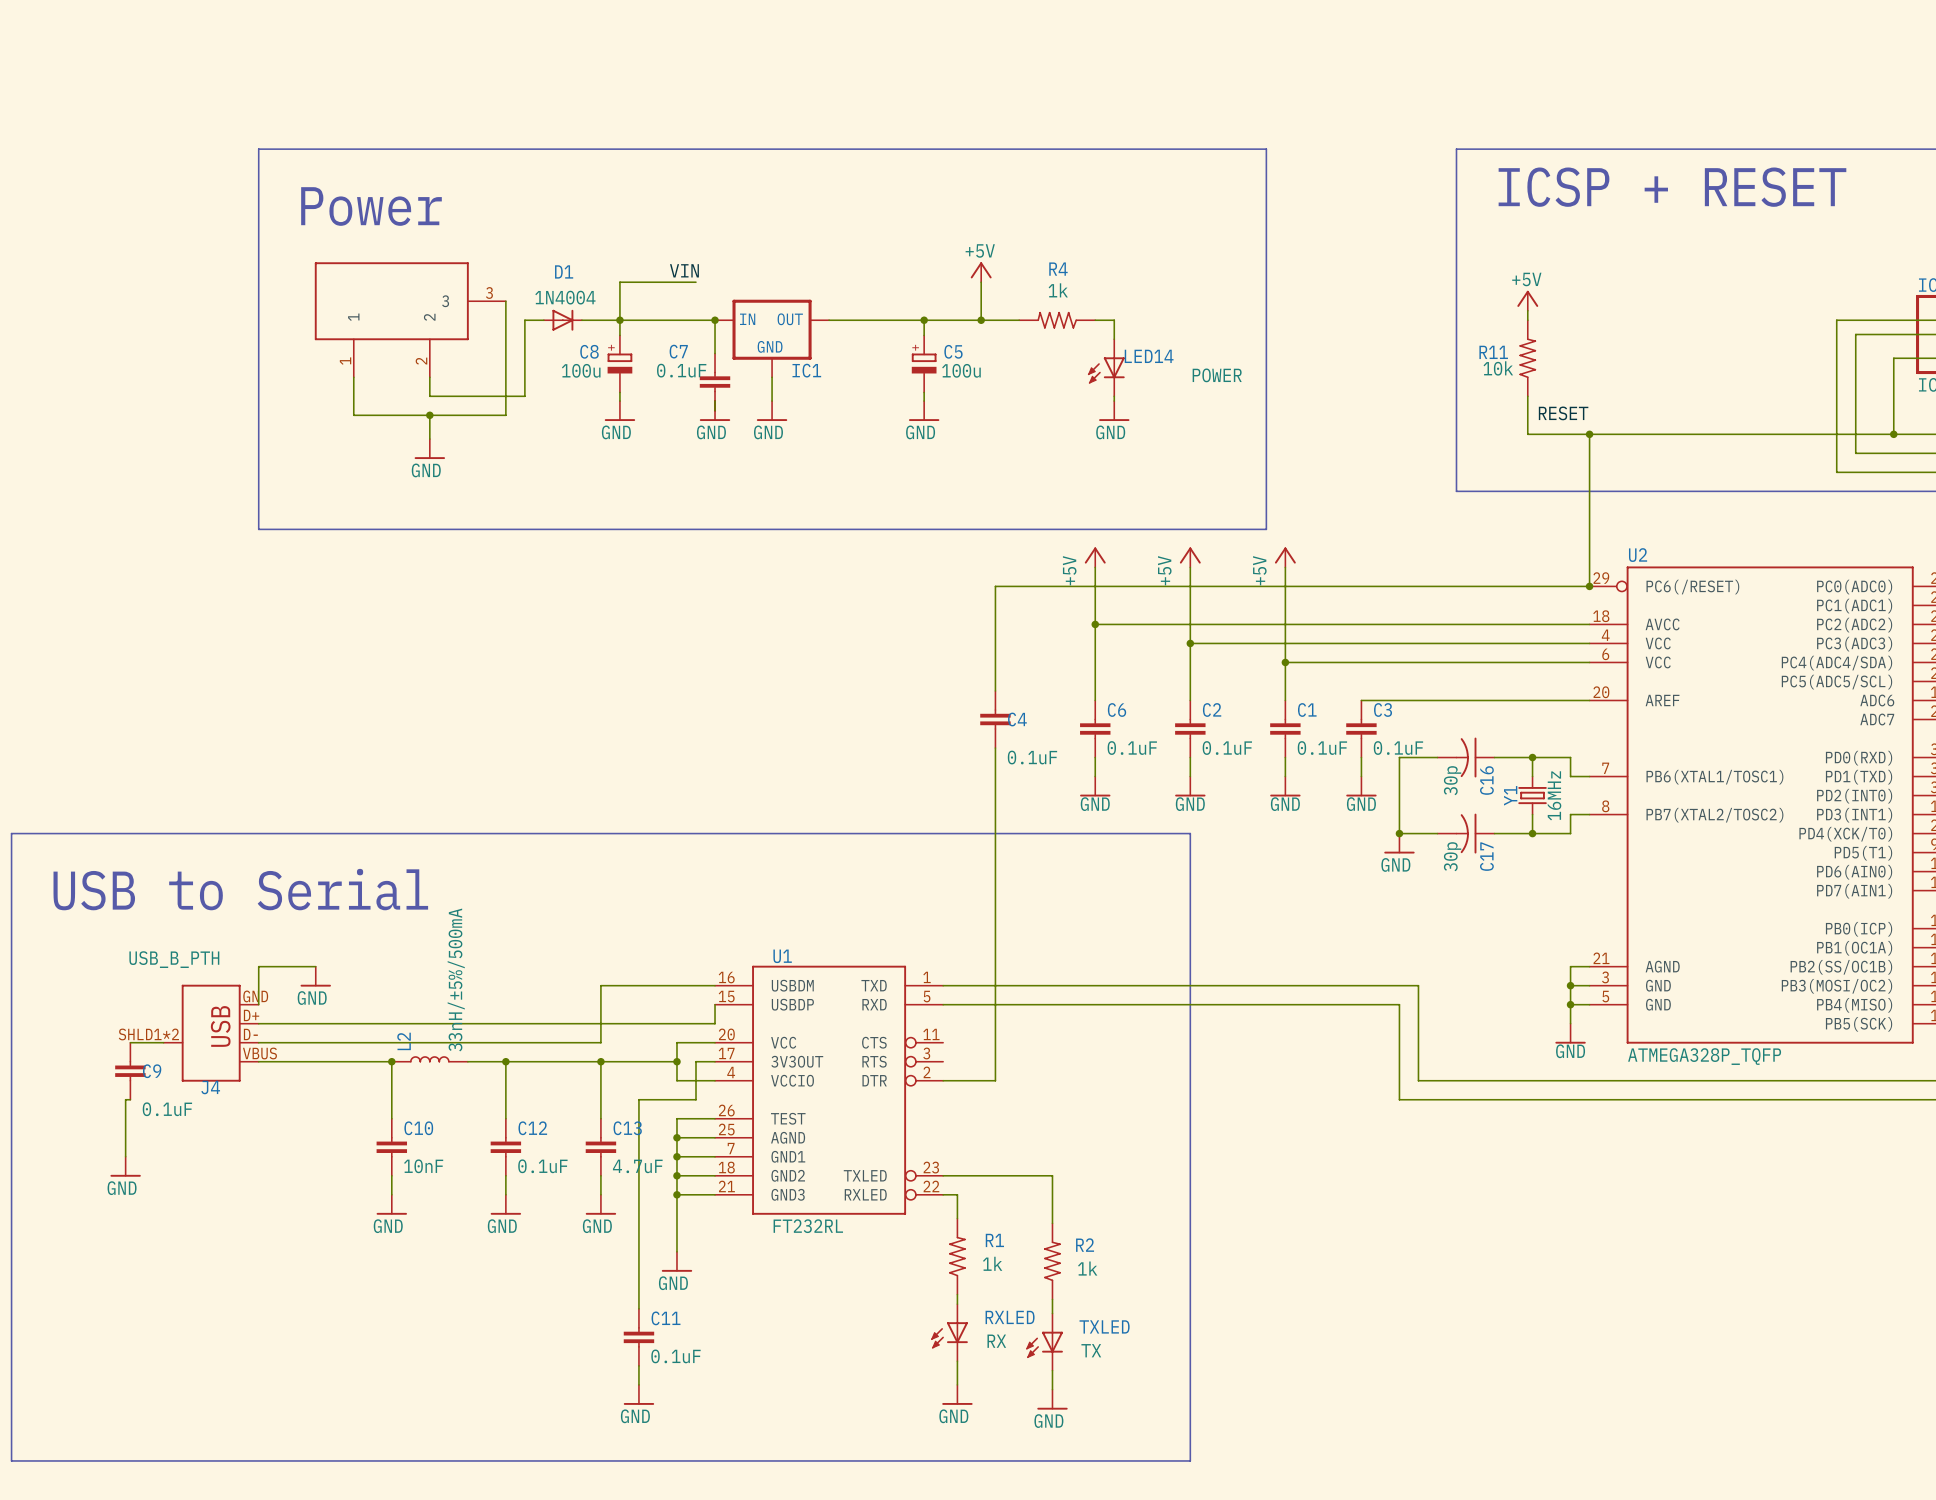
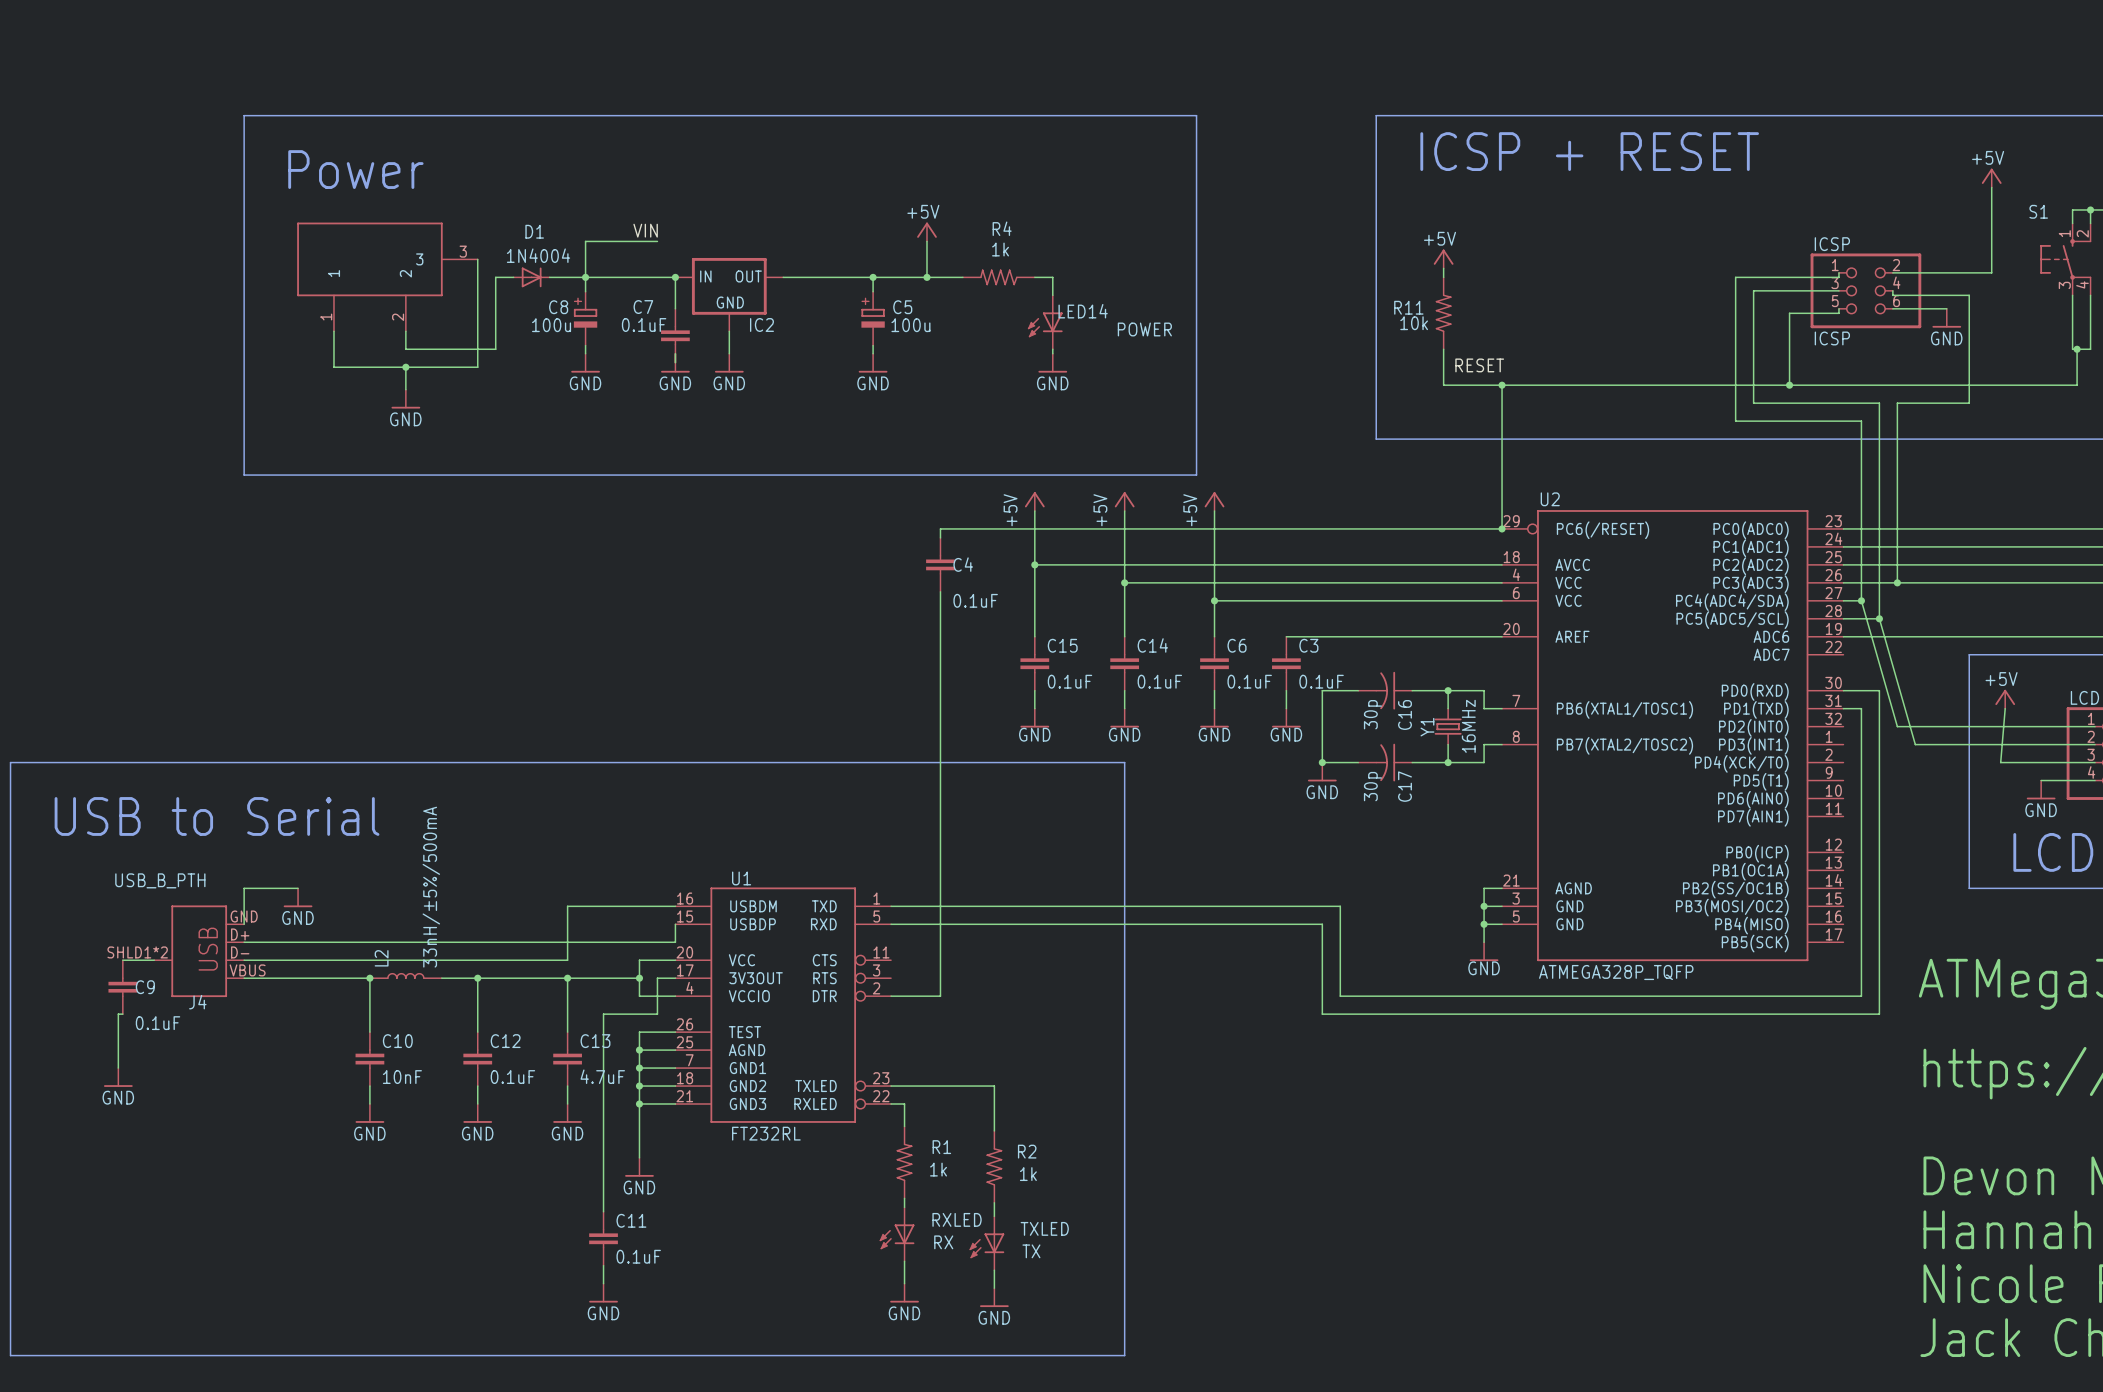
IC1 name: IC1 (806, 370) -> IC2 (761, 325)
C6 name: C6 (1117, 709) -> C15 (1062, 645)
C2 name: C2 (1212, 709) -> C14 (1152, 645)
C1 name: C1 (1307, 709) -> C6 (1237, 645)
C4 position: (995, 719) -> (940, 564)

